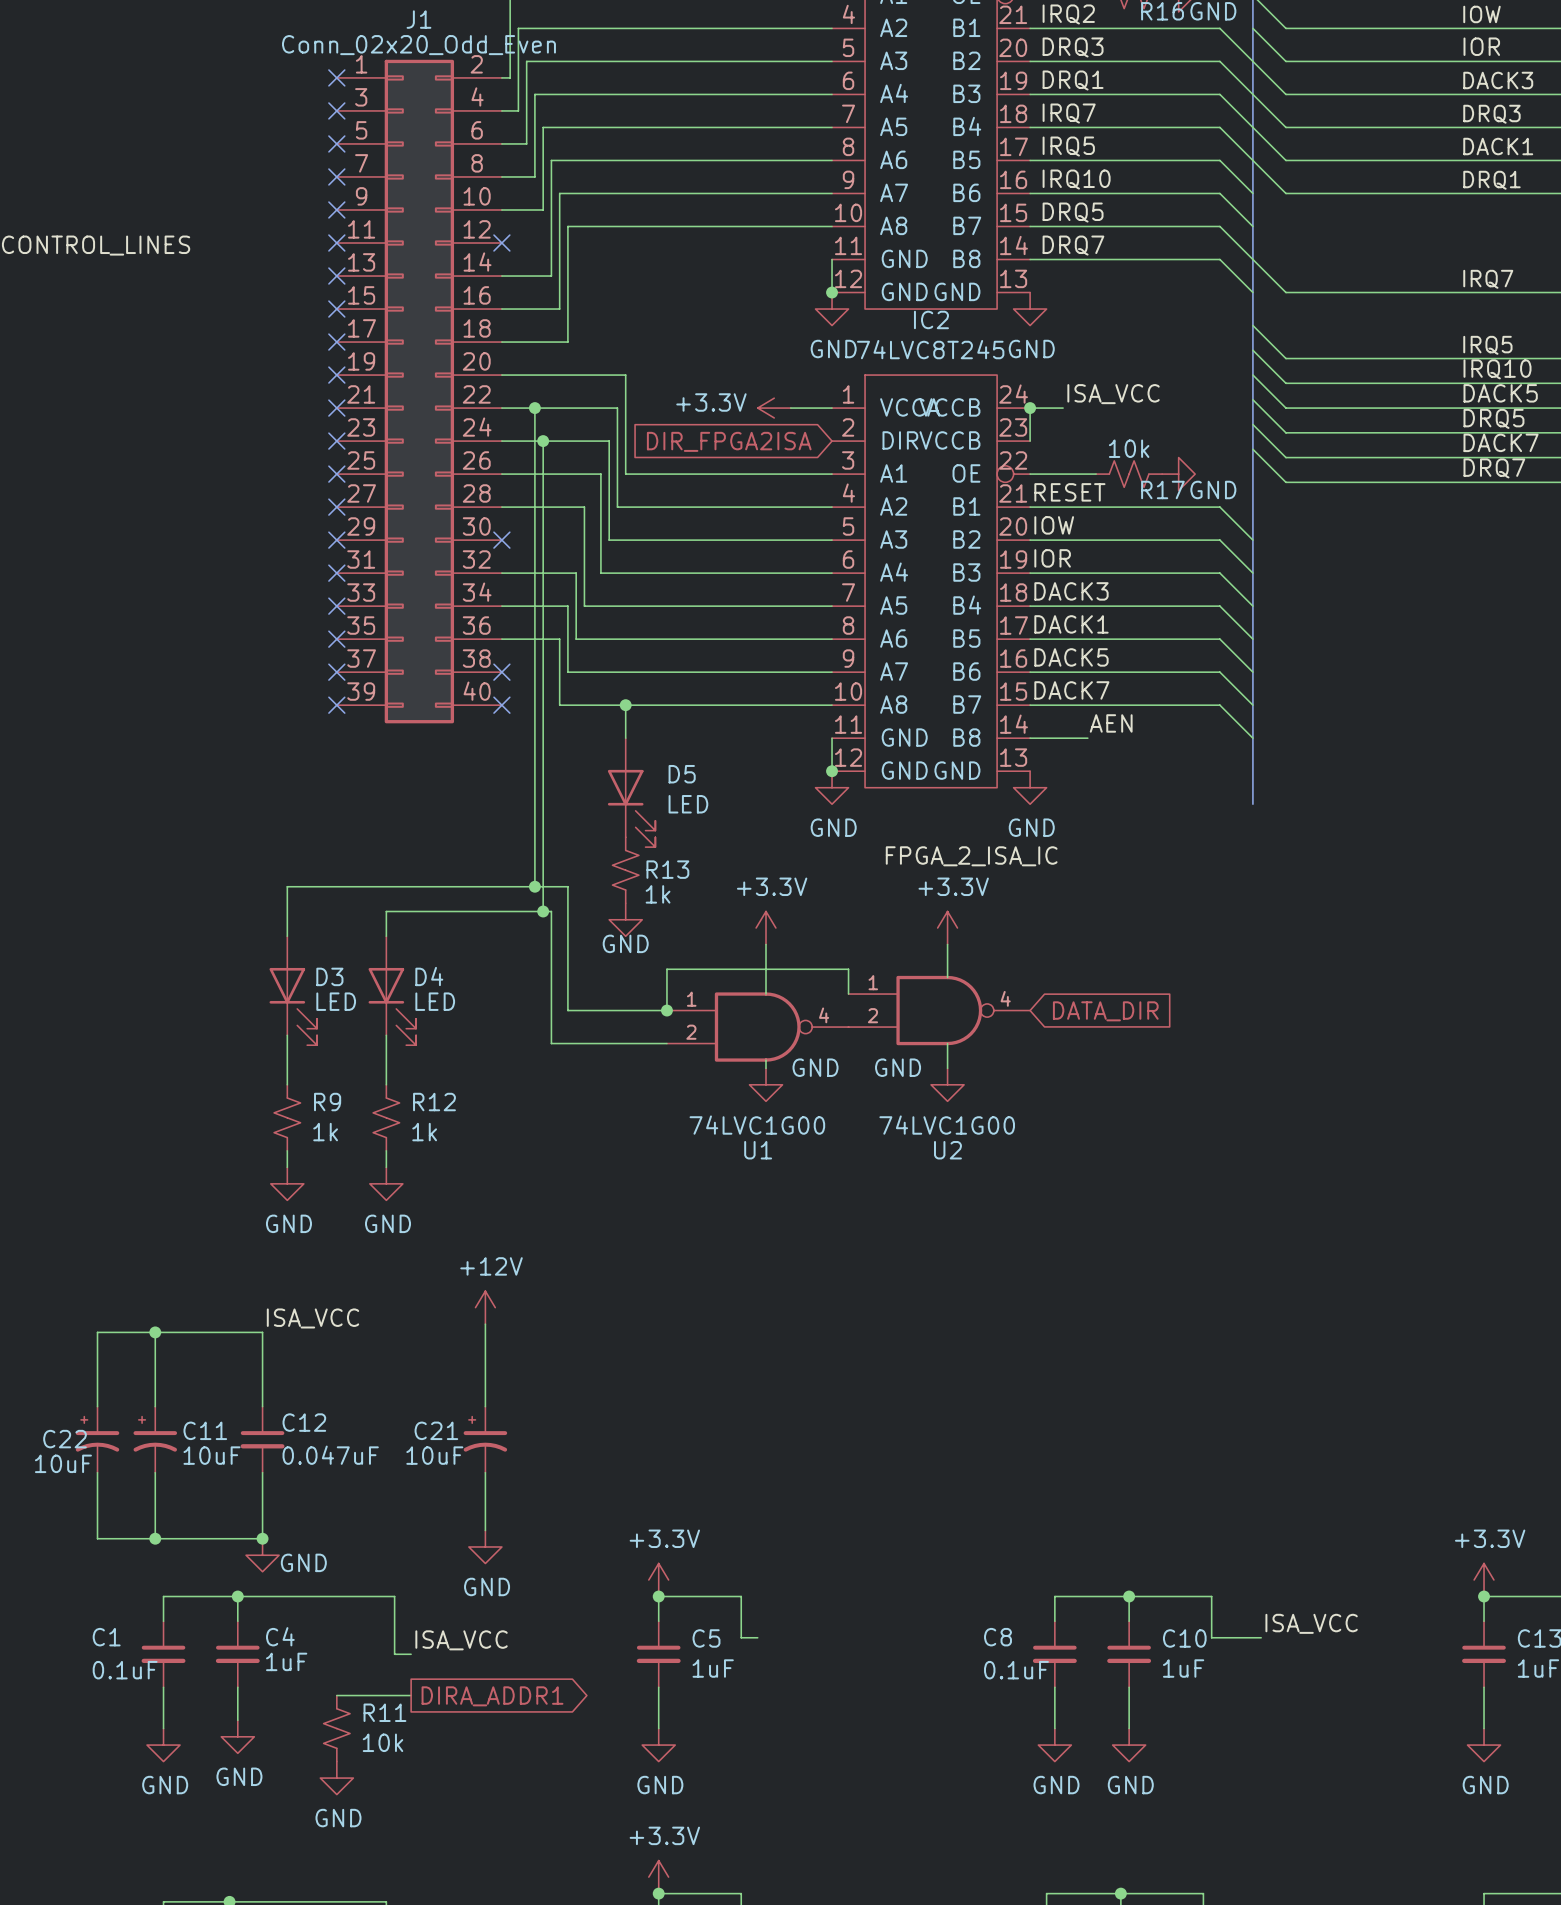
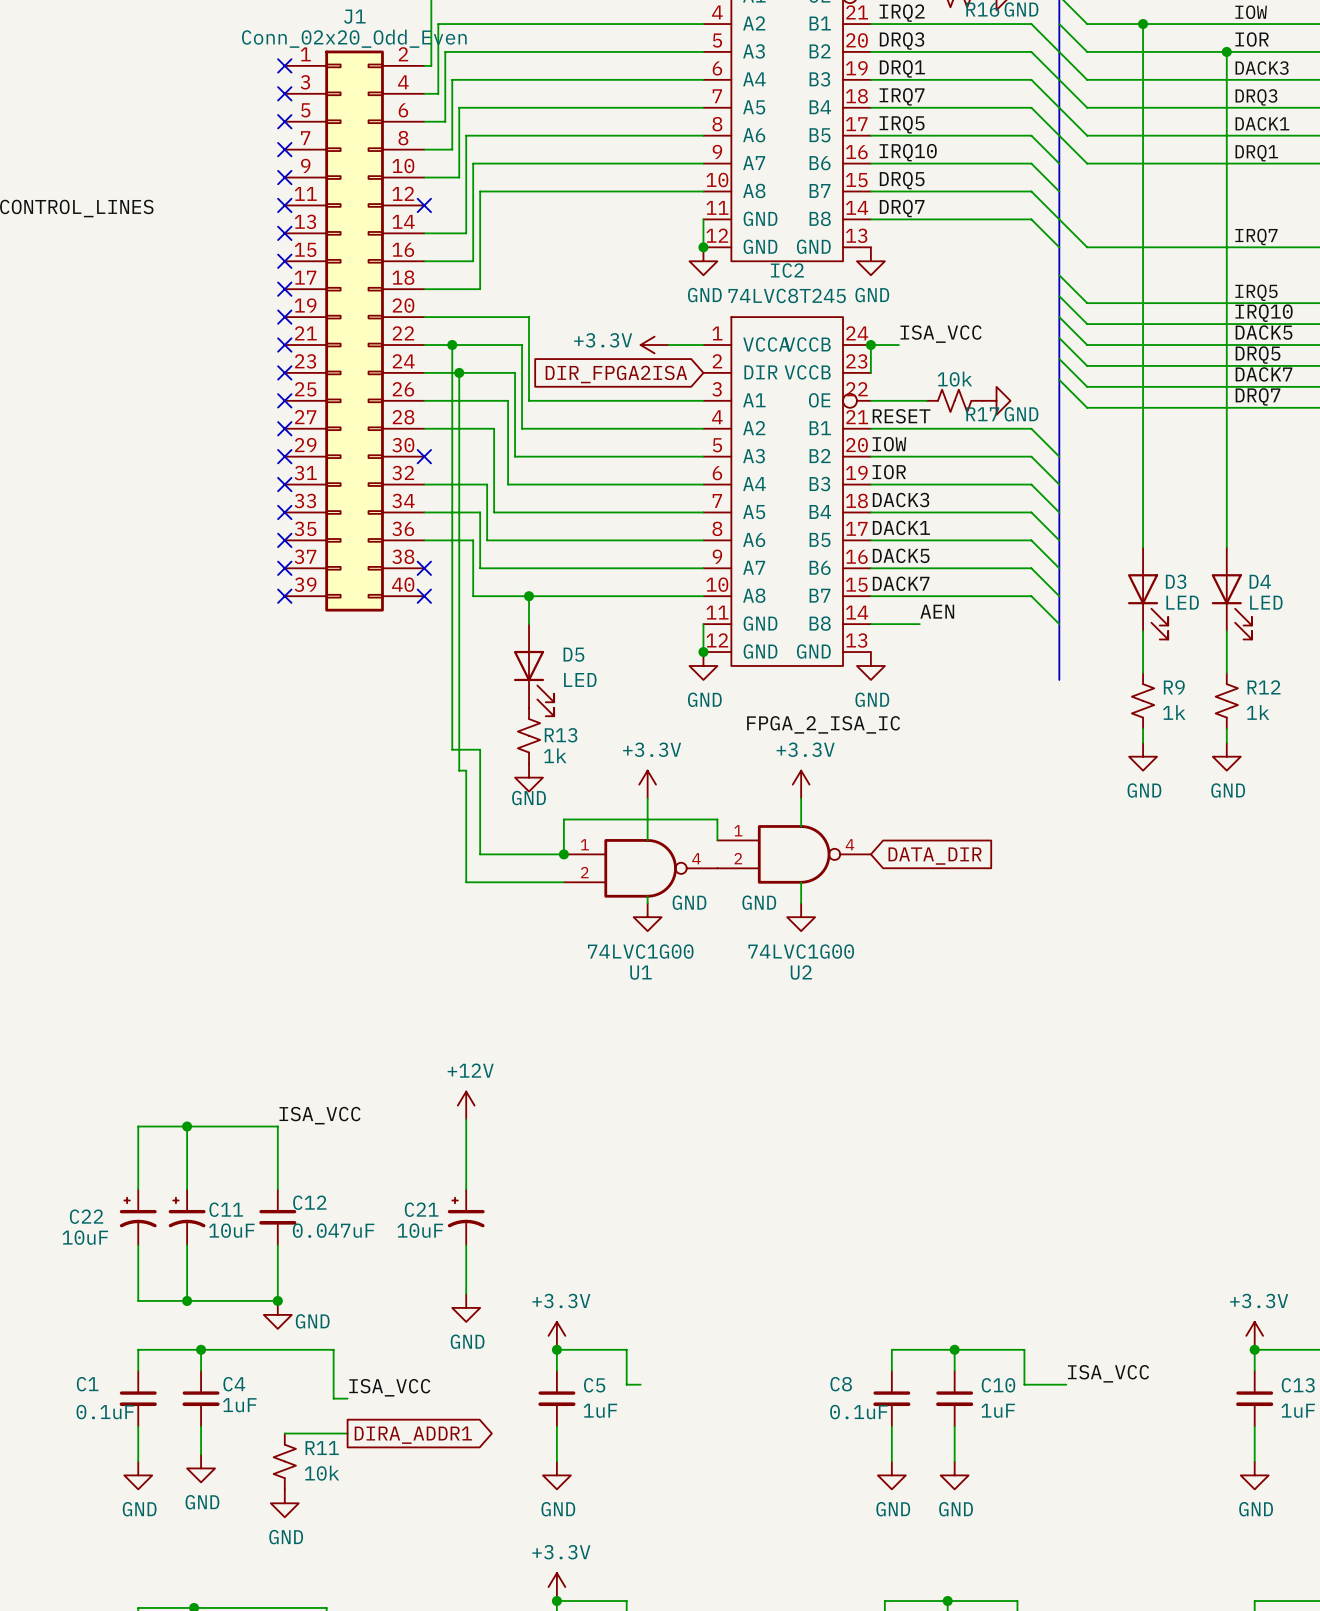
wire: none -> (1143, 24) (1143, 547)
junction: none -> (1143, 24)
wire: none -> (1226, 51) (1226, 547)
junction: none -> (1226, 51)
wire: none -> (1143, 631) (1143, 672)
wire: none -> (1226, 631) (1226, 672)
wire: none -> (1143, 728) (1143, 742)
wire: none -> (1226, 728) (1226, 742)
wire: (534, 886) (287, 886) (287, 936) -> none
junction: (534, 886) -> none
power symbol: none -> GND (1143, 756)
power symbol: none -> GND (1226, 756)
wire: (543, 911) (386, 911) (386, 936) -> none
junction: (543, 911) -> none
D3 position: (293, 990) -> (1148, 593)
D4 position: (392, 990) -> (1231, 593)
wire: (287, 1035) (287, 1084) -> none
wire: (386, 1035) (386, 1084) -> none
R9 position: (287, 1117) -> (1143, 700)
R12 position: (386, 1117) -> (1226, 700)
wire: (287, 1150) (287, 1167) -> none
wire: (386, 1150) (386, 1167) -> none
power symbol: GND (287, 1183) -> none
power symbol: GND (386, 1183) -> none
power symbol position: +12V (485, 1307) -> +12V (466, 1105)
label position: ISA_VCC (312, 1318) -> ISA_VCC (320, 1115)
wire: (485, 1324) (485, 1406) -> (466, 1119) (466, 1189)
wire: (155, 1332) (155, 1406) -> (187, 1126) (187, 1189)
junction position: (155, 1332) -> (187, 1126)
wire: (163, 1332) (97, 1332) (97, 1406) -> (138, 1126) (138, 1189)
wire: (262, 1332) (262, 1406) -> (221, 1126) (277, 1126) (277, 1189)
C22 name position: C22 (65, 1439) -> C22 (86, 1216)
C22 position: (97, 1439) -> (138, 1217)
C11 position: (155, 1439) -> (187, 1217)
C12 position: (262, 1439) -> (277, 1217)
C21 position: (485, 1439) -> (466, 1217)
C22 value position: 10uF (63, 1463) -> 10uF (85, 1237)
wire: (97, 1472) (97, 1538) (163, 1538) -> (138, 1245) (138, 1300)
wire: (155, 1472) (155, 1538) -> (187, 1245) (187, 1300)
wire: (262, 1472) (262, 1538) -> (277, 1245) (277, 1300) (221, 1300)
wire: (485, 1472) (485, 1530) -> (466, 1245) (466, 1293)
junction: (155, 1538) -> none
junction: none -> (187, 1300)
junction: (262, 1538) -> none
junction: none -> (277, 1300)
power symbol position: GND (485, 1546) -> GND (466, 1307)
power symbol position: GND (262, 1555) -> GND (277, 1314)

